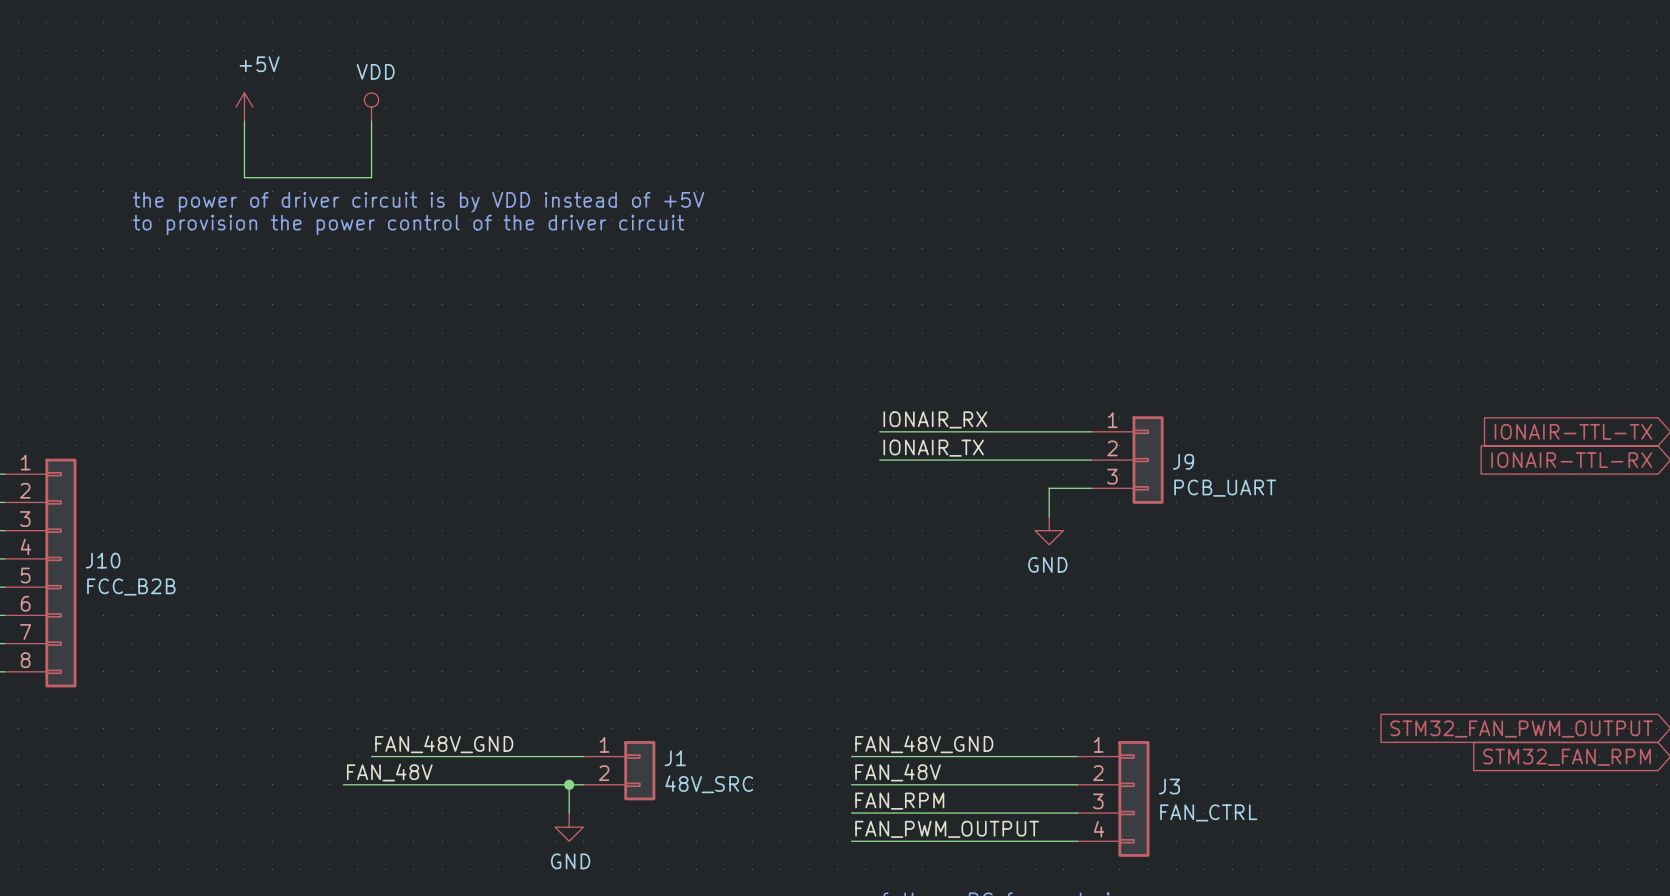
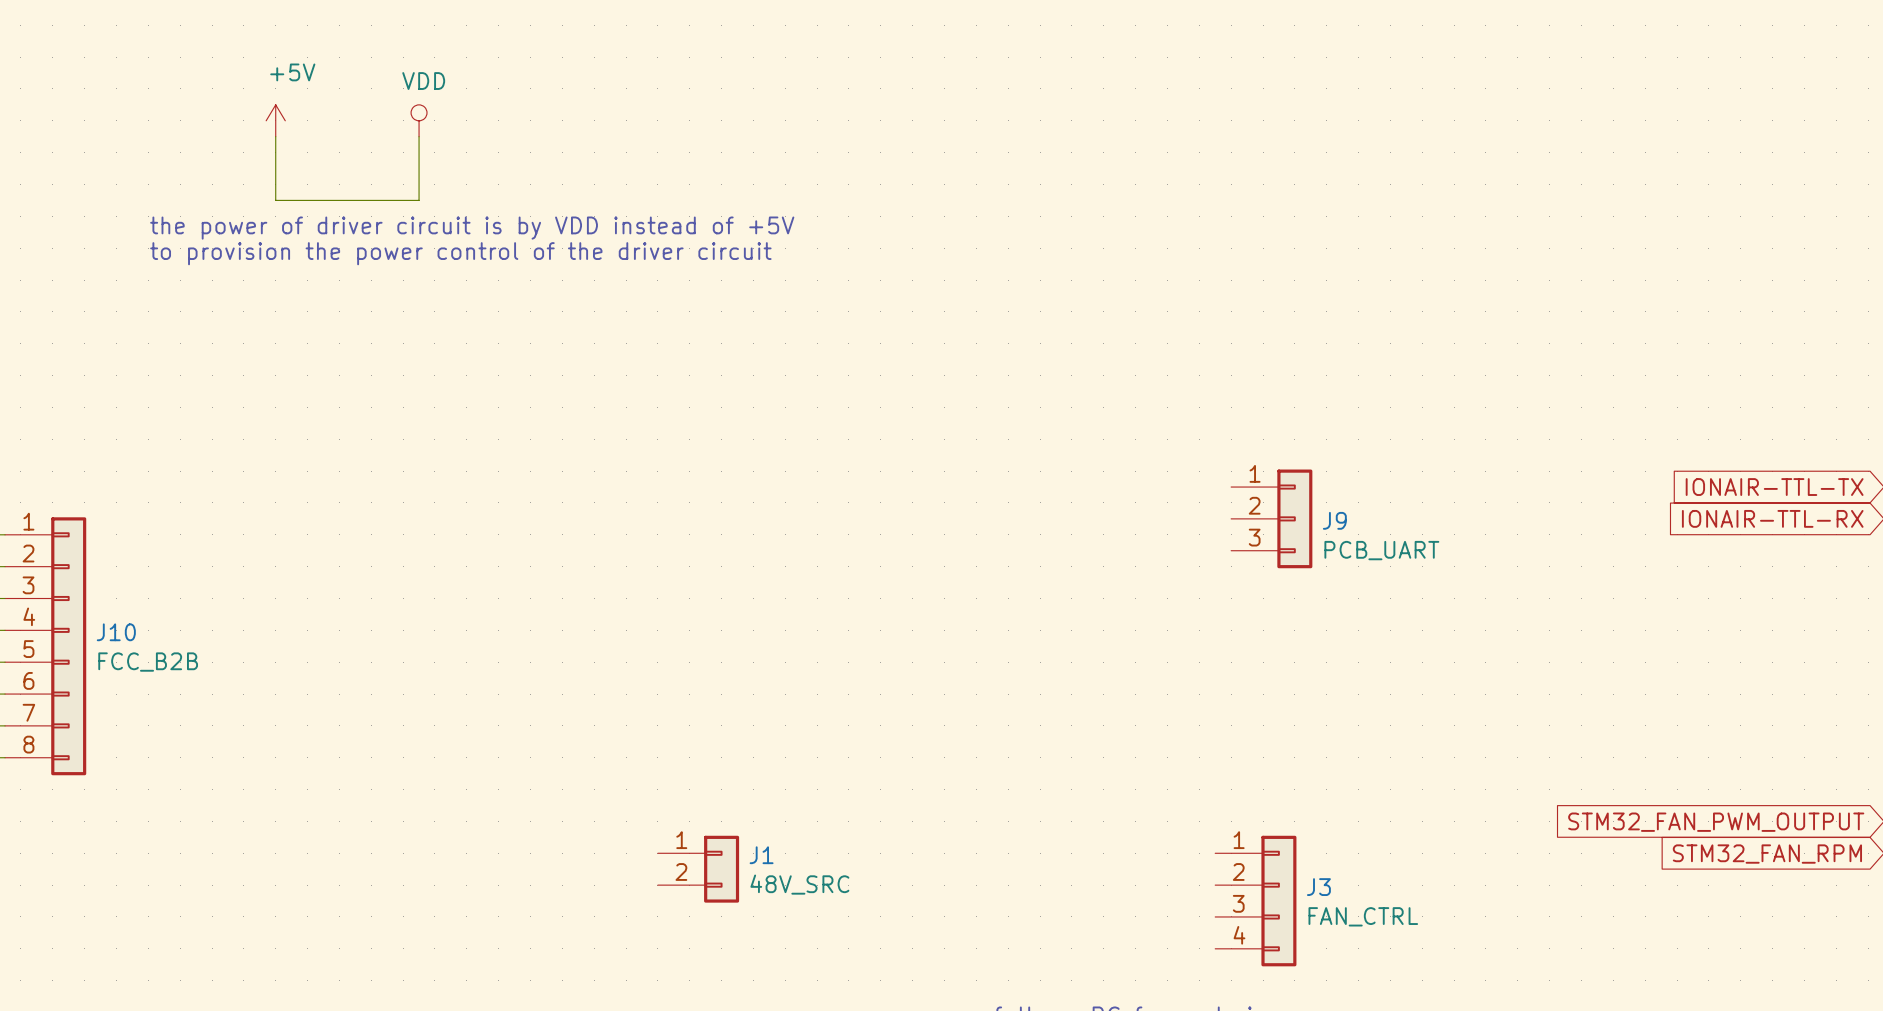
label: IONAIR_RX (935, 419) -> none
wire: (879, 431) (1091, 431) -> none
label: IONAIR_TX (933, 448) -> none
wire: (879, 460) (1091, 460) -> none
wire: (1091, 488) (1049, 488) (1049, 516) -> none
power symbol: GND (1049, 530) -> none
label: FAN_48V_GND (444, 744) -> none
label: FAN_48V_GND (924, 744) -> none
wire: (371, 756) (583, 756) -> none
wire: (851, 756) (1077, 756) -> none
label: FAN_48V (389, 772) -> none
label: FAN_48V (898, 772) -> none
wire: (343, 784) (583, 784) -> none
wire: (569, 784) (569, 813) -> none
junction: (569, 784) -> none
wire: (851, 784) (1077, 784) -> none
label: FAN_RPM (899, 801) -> none
wire: (851, 813) (1077, 813) -> none
power symbol: GND (569, 827) -> none
label: FAN_PWM_OUTPUT (947, 829) -> none
wire: (851, 841) (1077, 841) -> none

